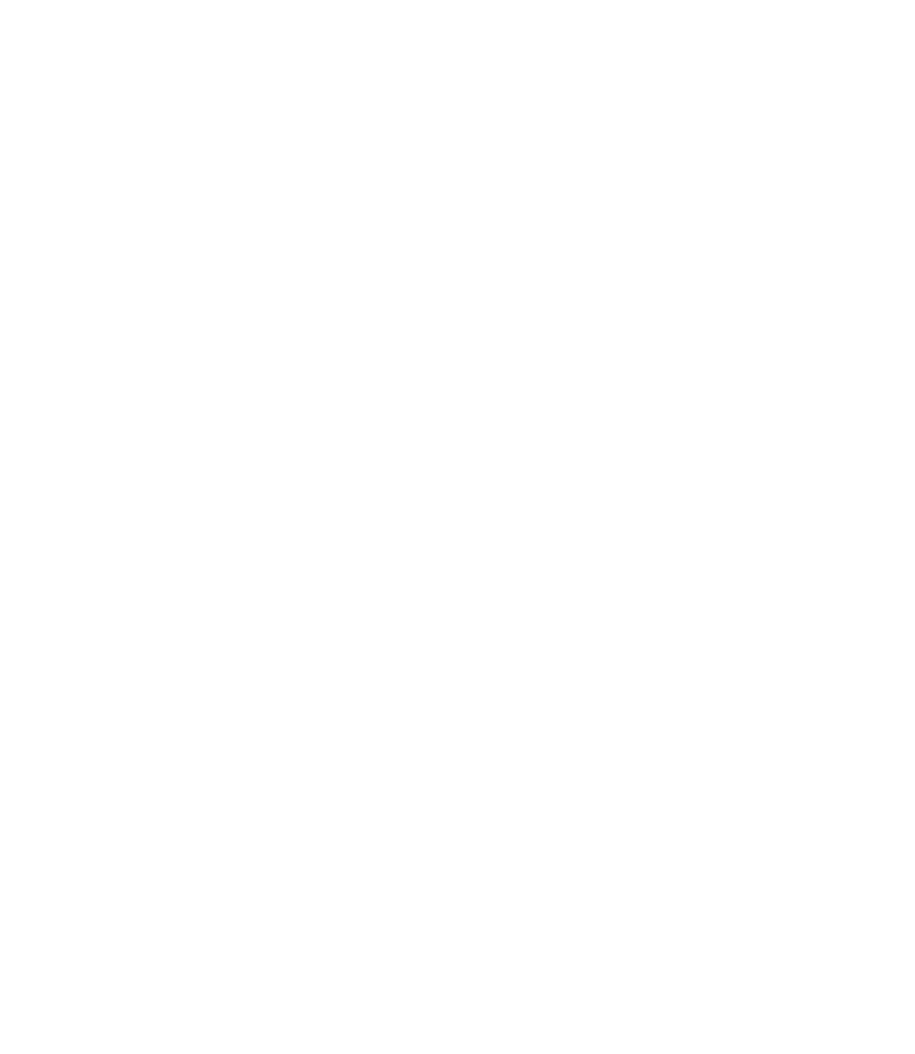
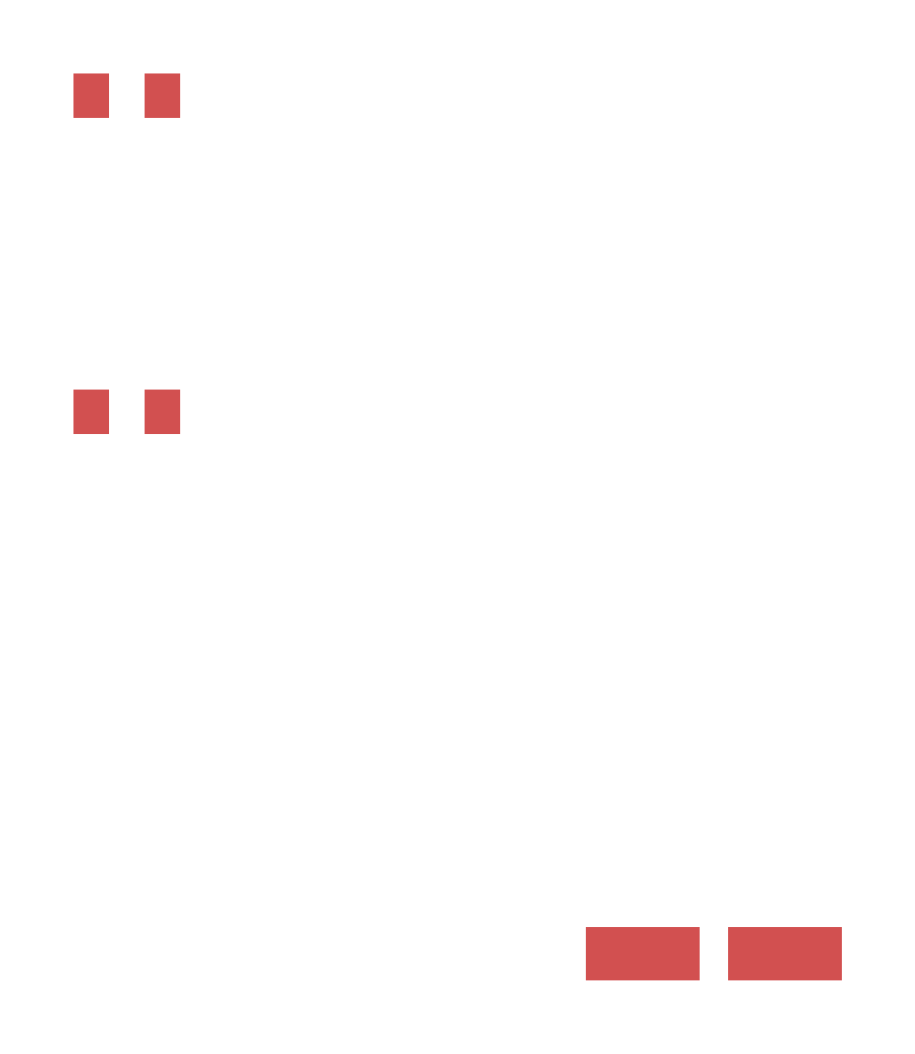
part: none -> (126, 95)
part: none -> (126, 411)
part: none -> (713, 953)

